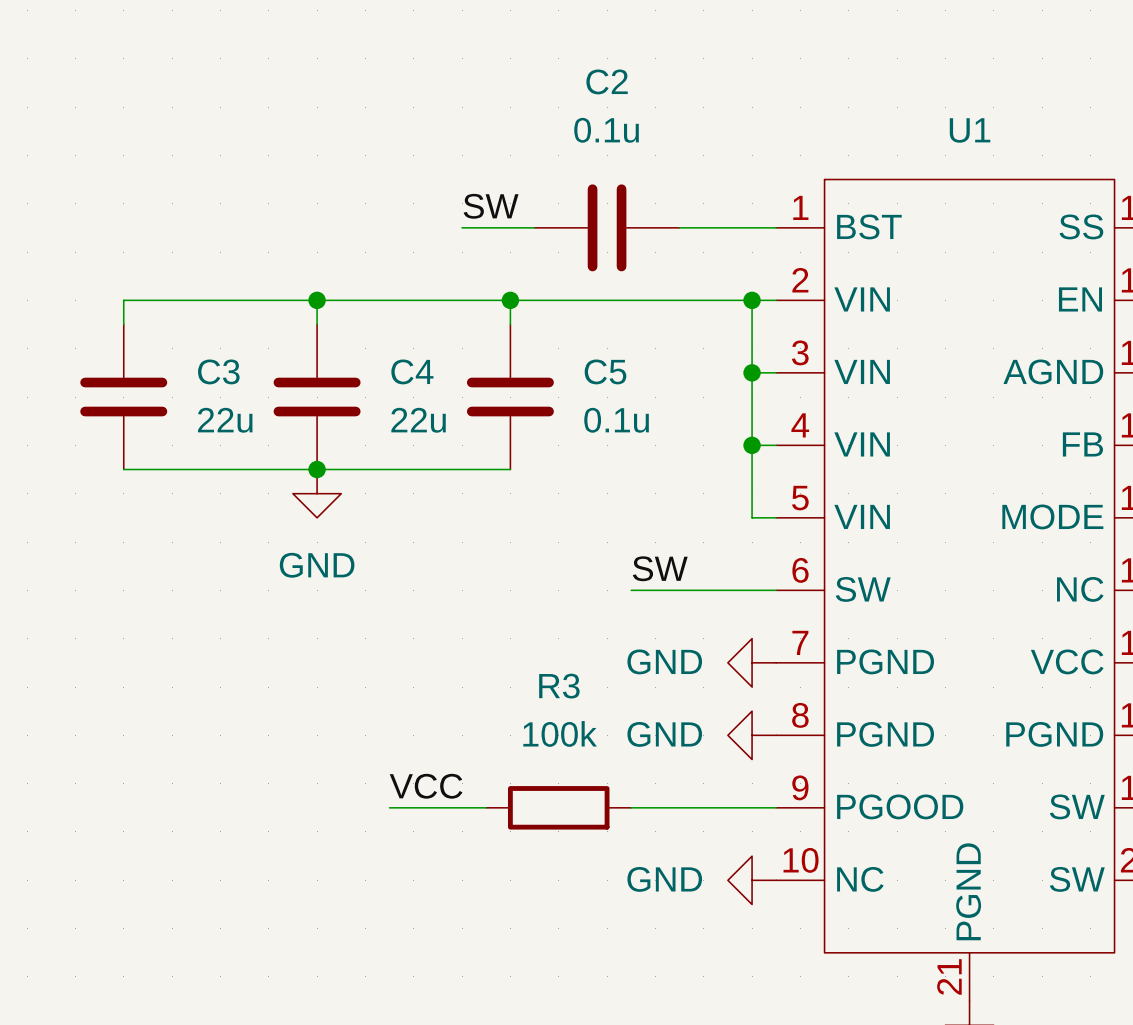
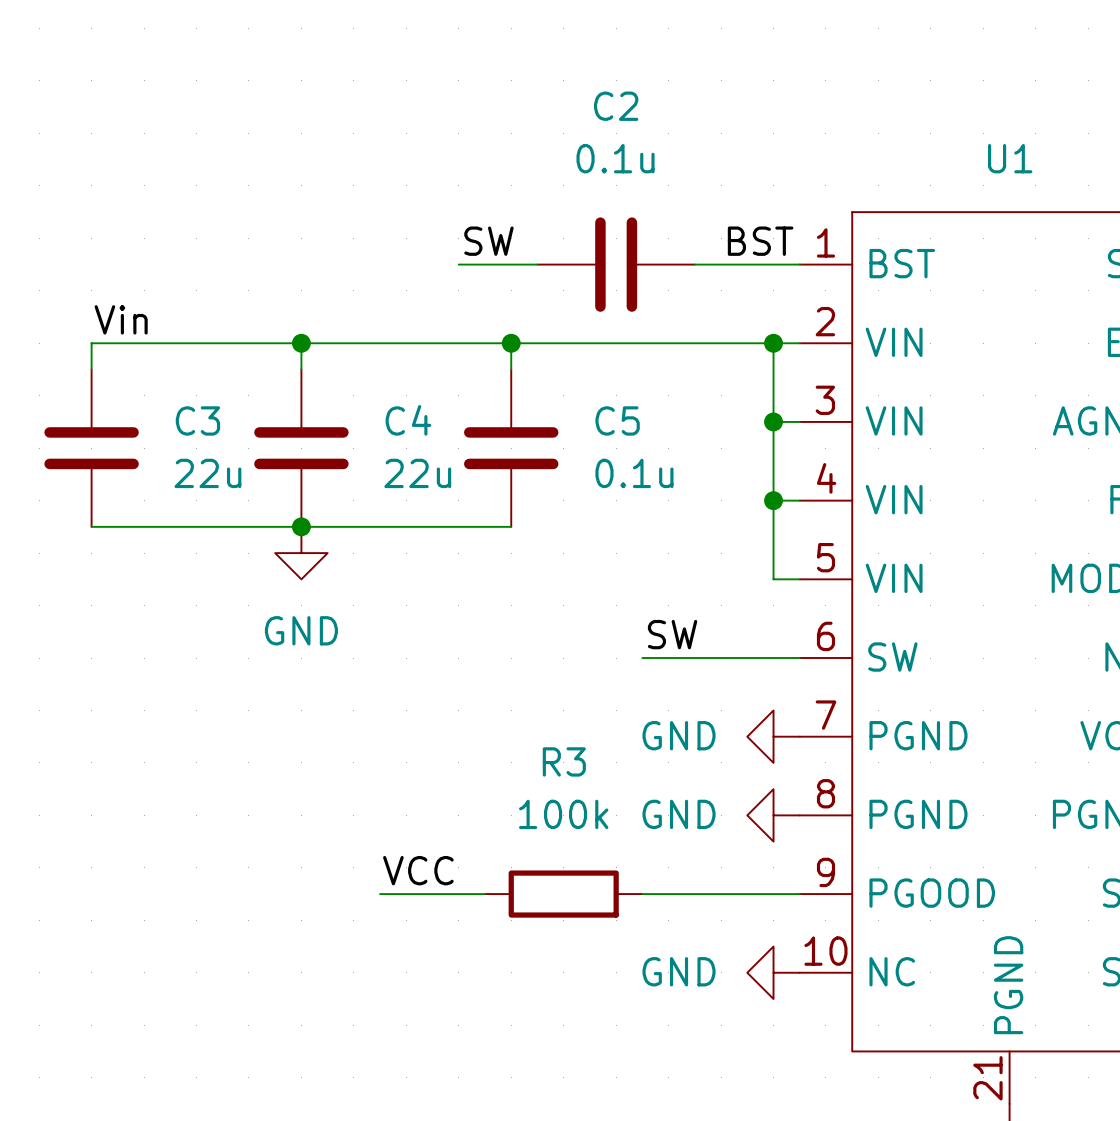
label: none -> BST (760, 241)
label: none -> Vin (121, 319)

